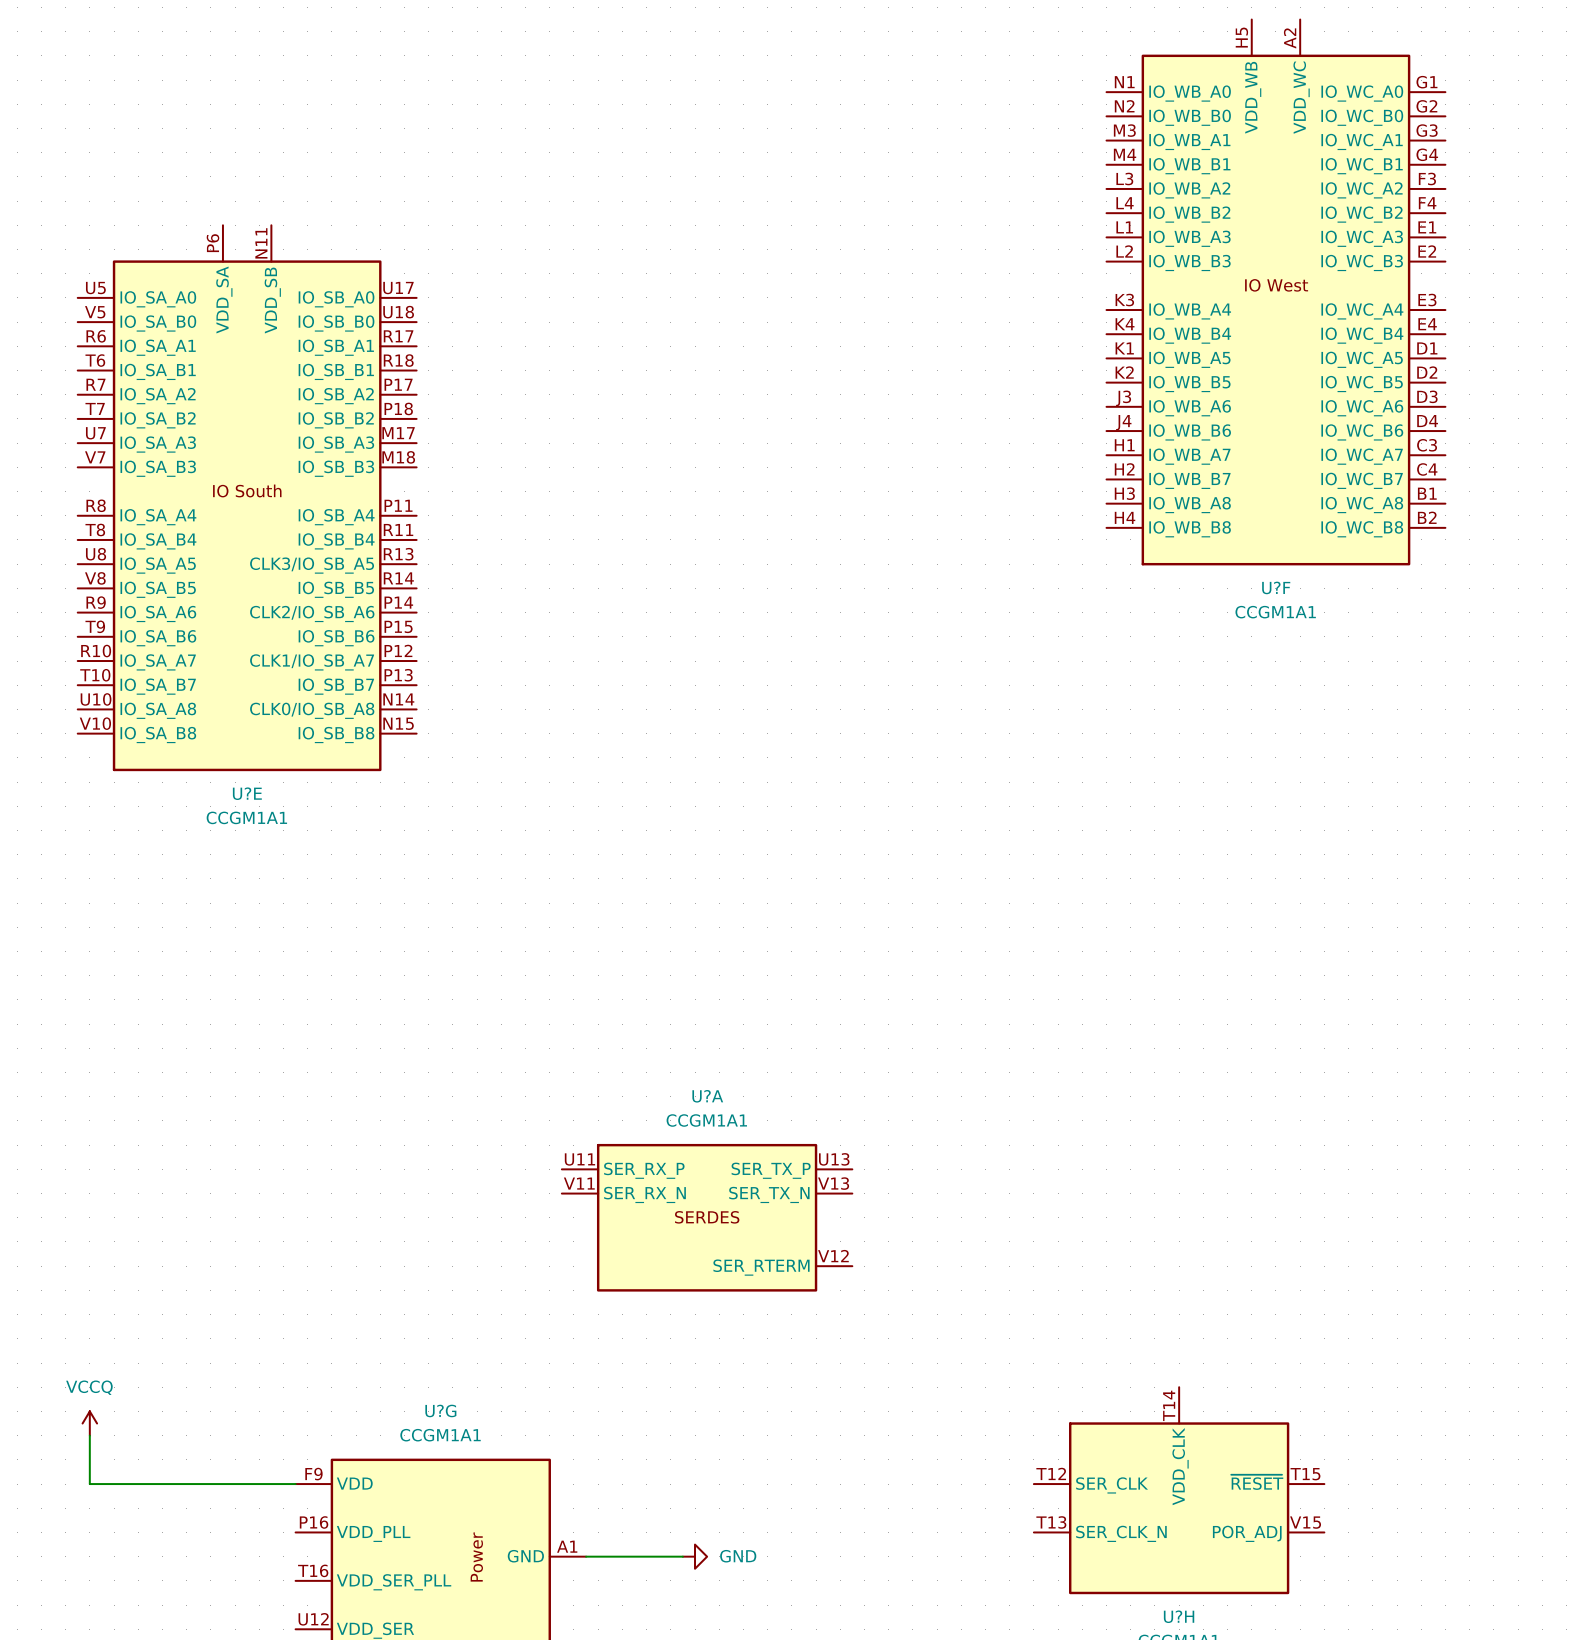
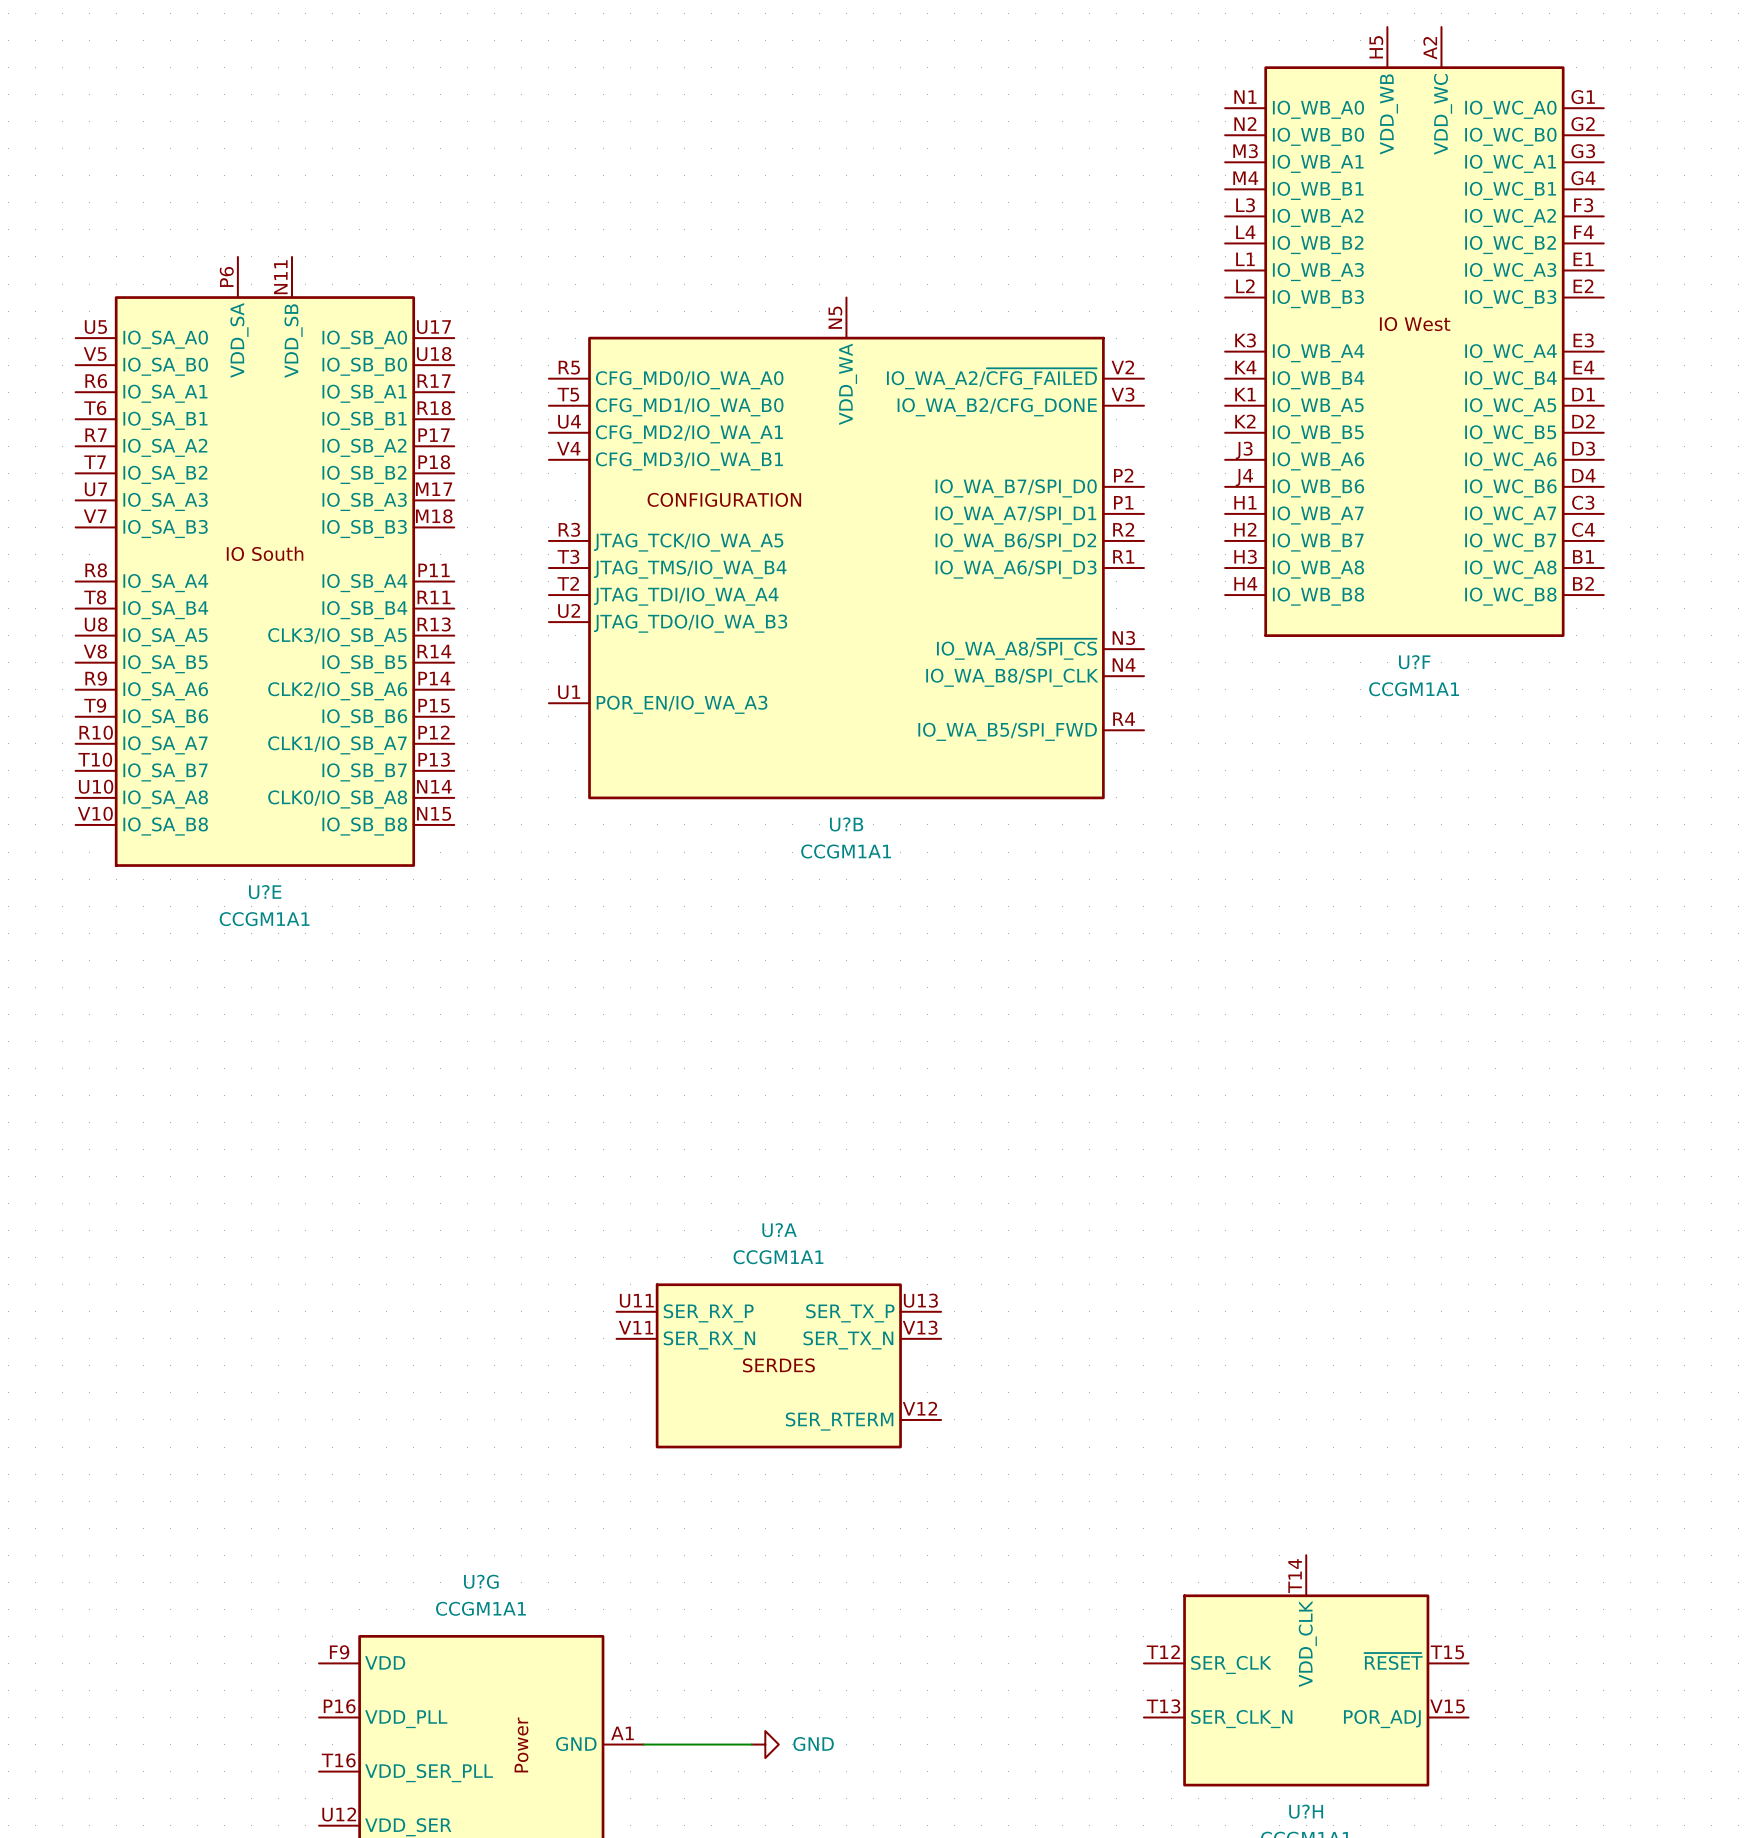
U?B: none -> CCGM1A1 (846, 548)
power symbol: VCCQ (89, 1423) -> none
wire: (89, 1435) (89, 1484) (295, 1484) -> none

